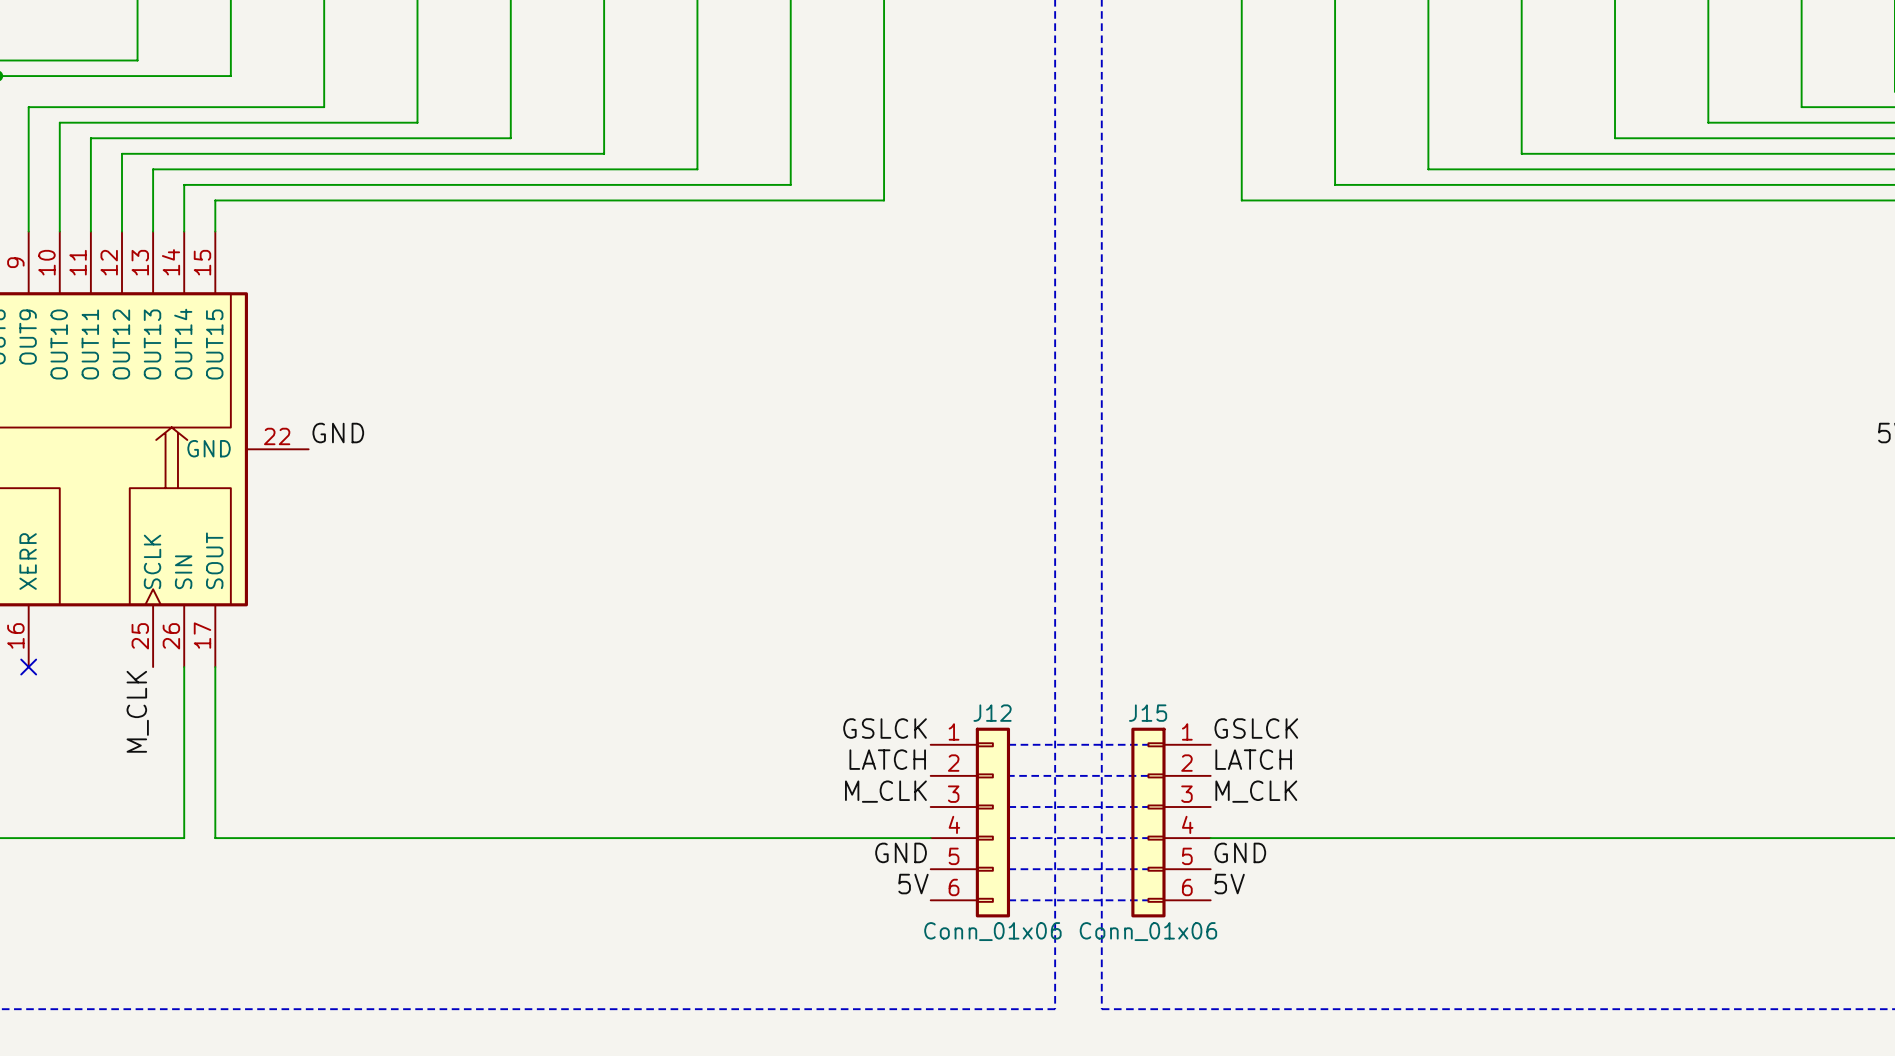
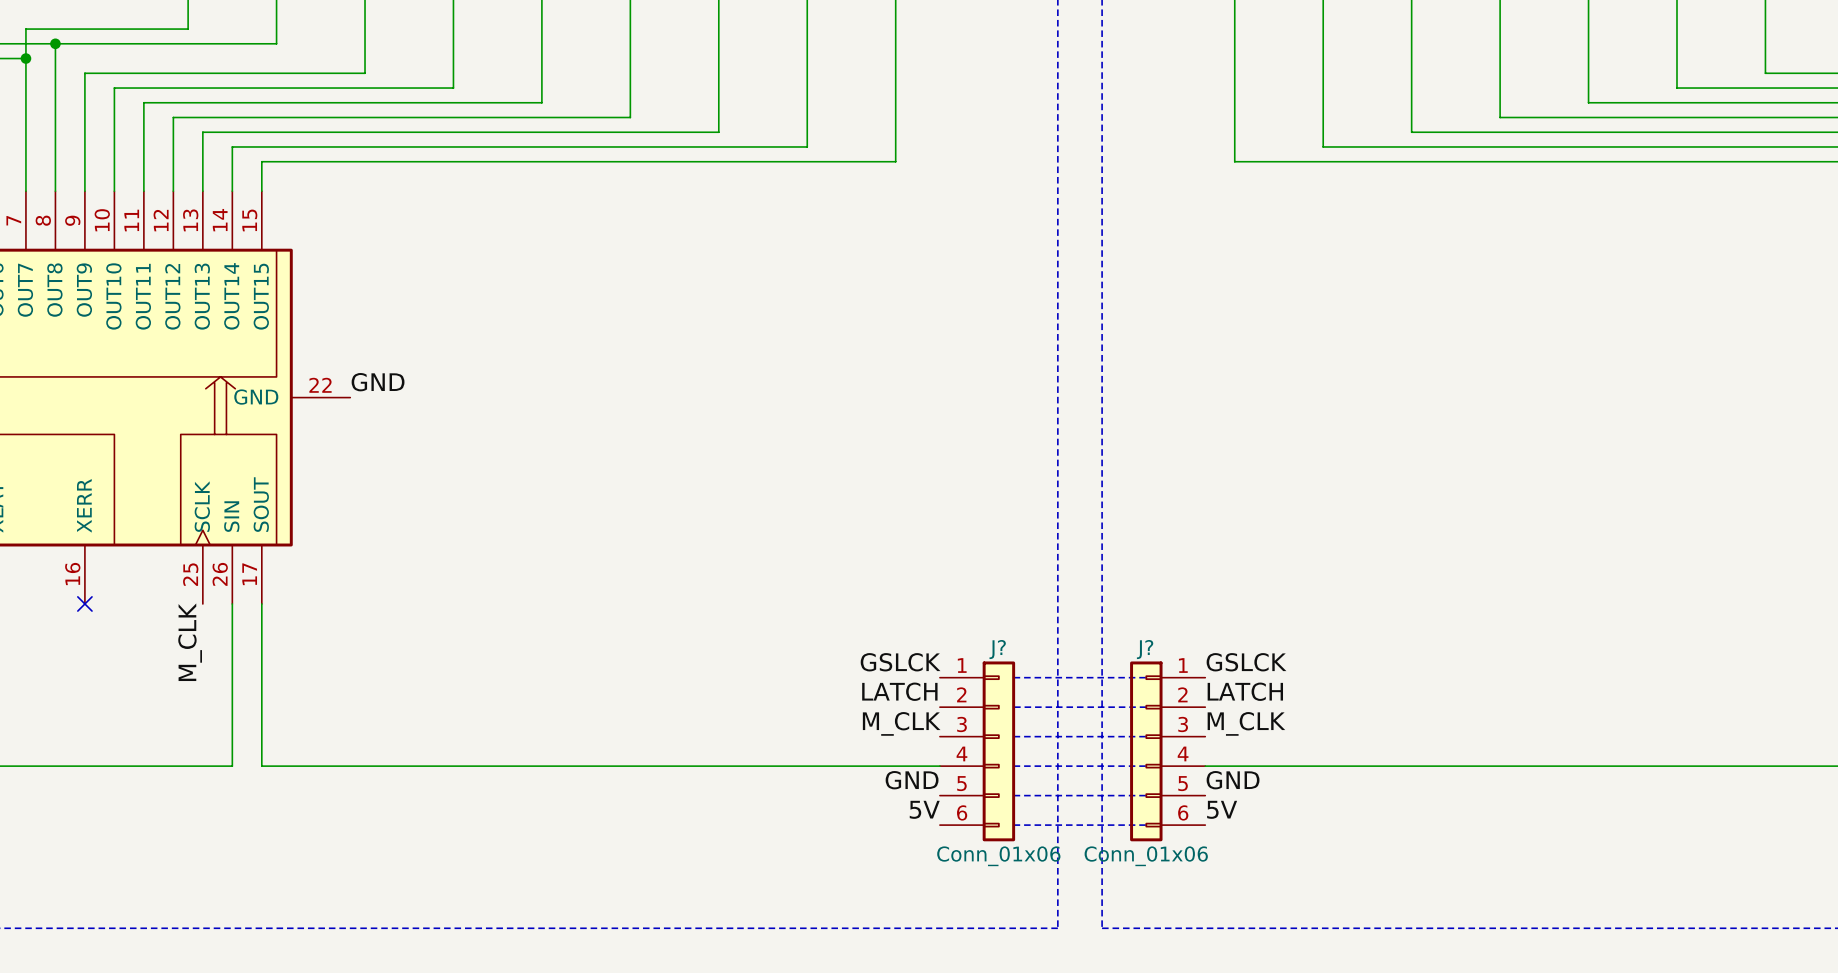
J12 name: J12 (992, 713) -> J? (997, 649)
J15 name: J15 (1148, 713) -> J? (1145, 649)

